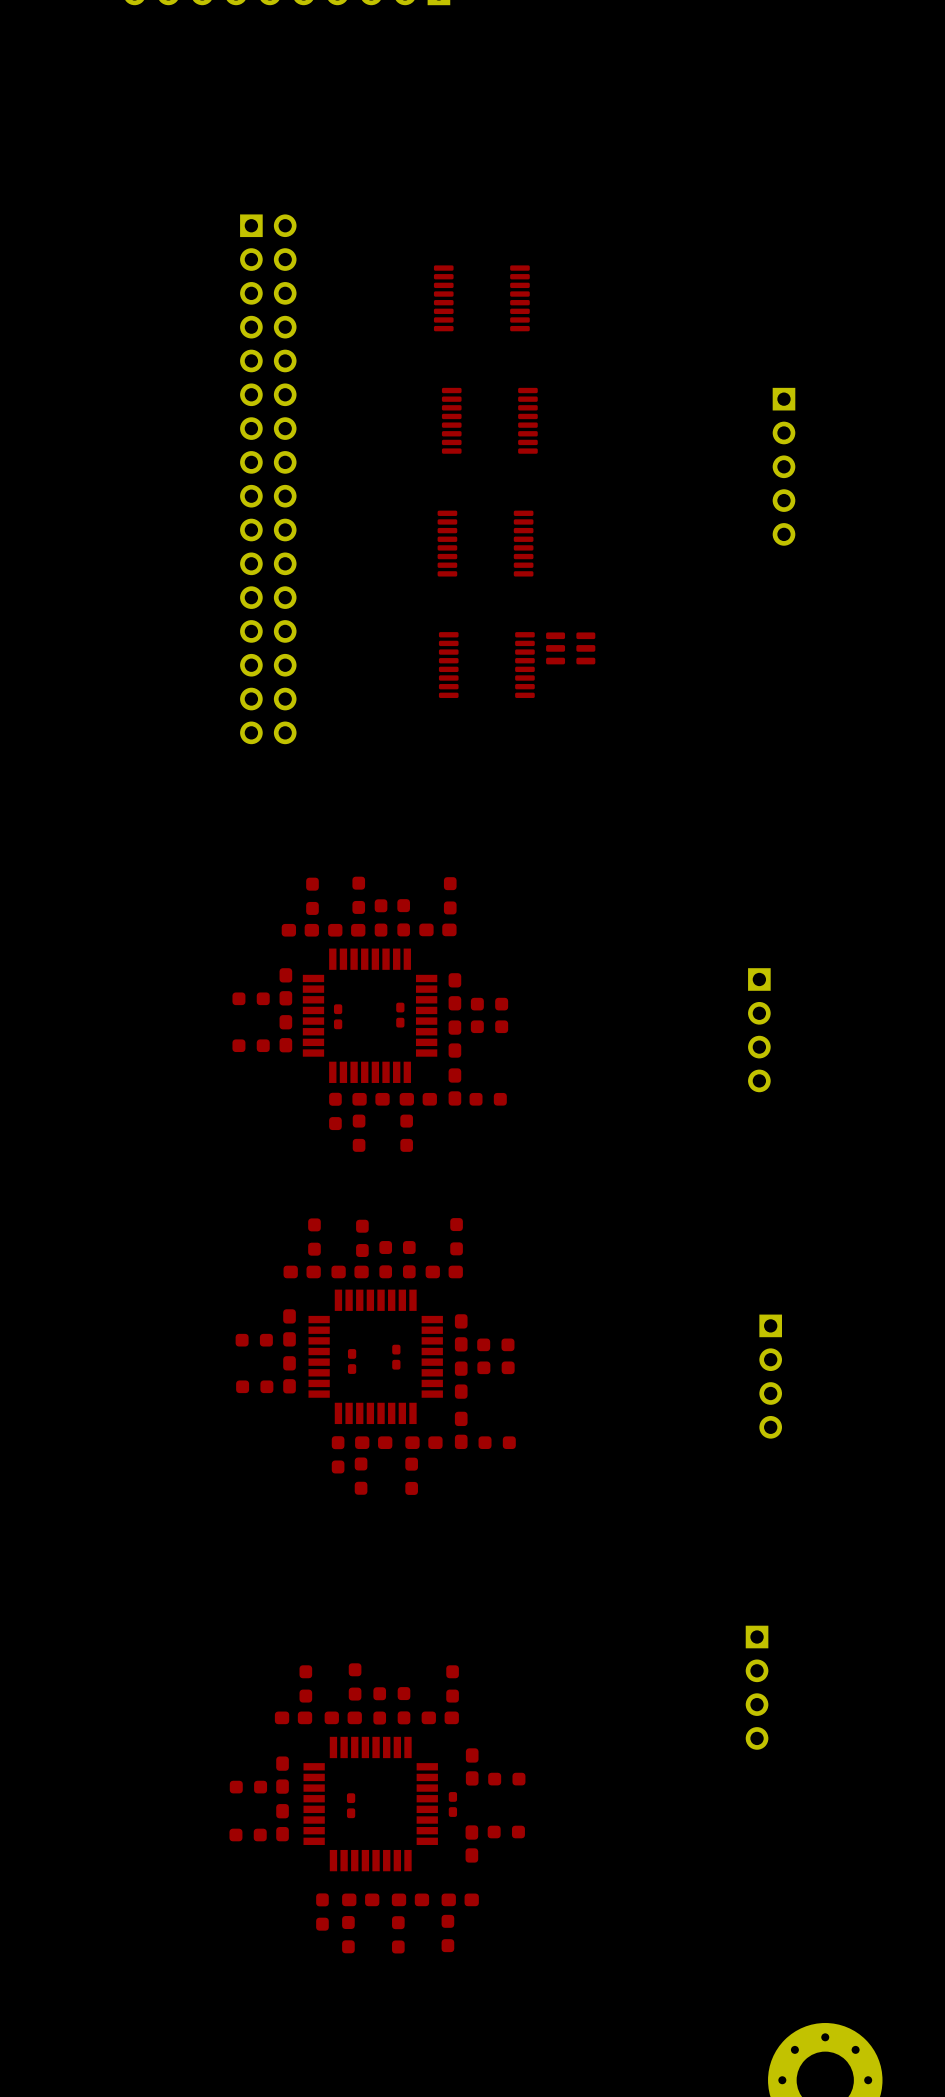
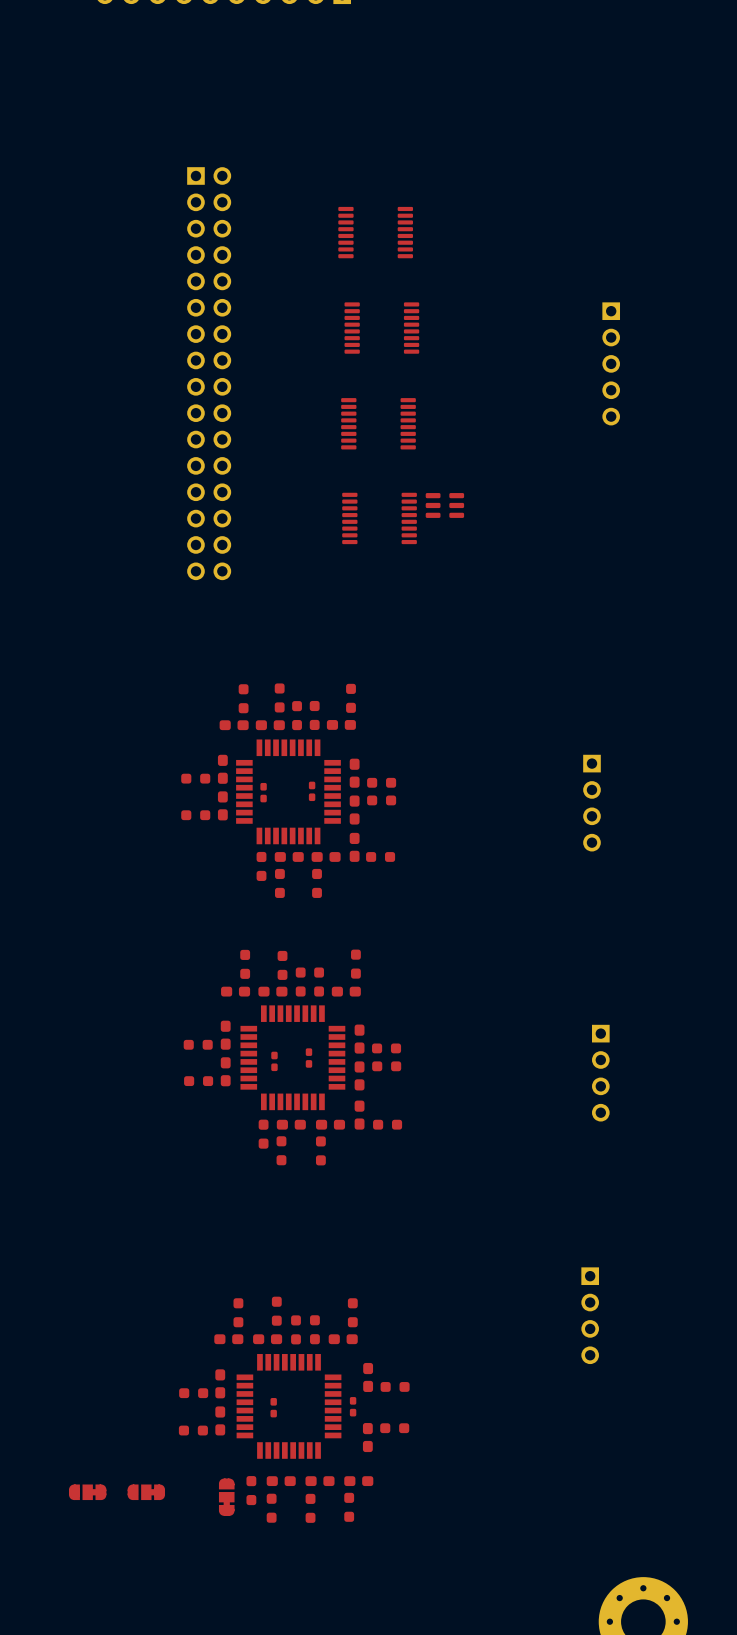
part: none -> (87, 1492)
part: none -> (146, 1492)
part: none -> (226, 1497)

